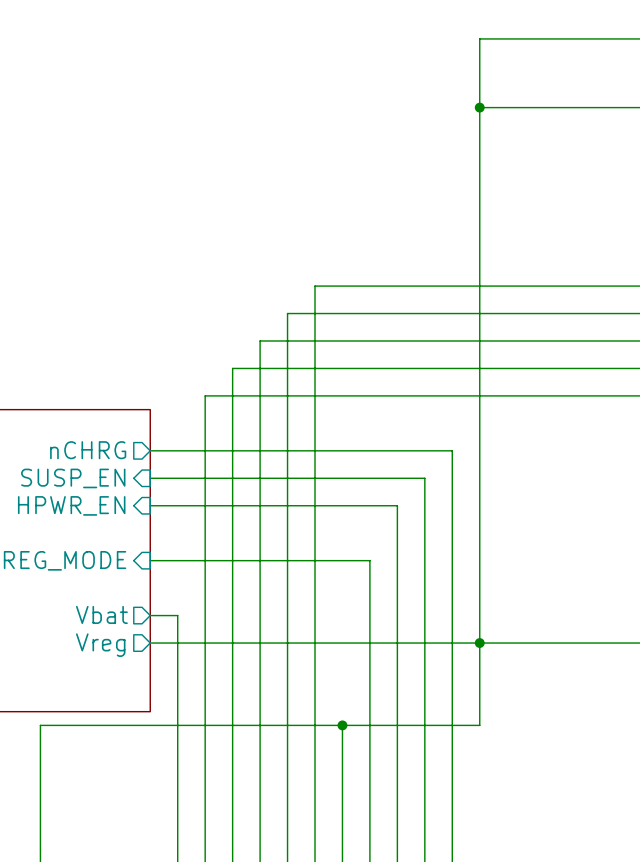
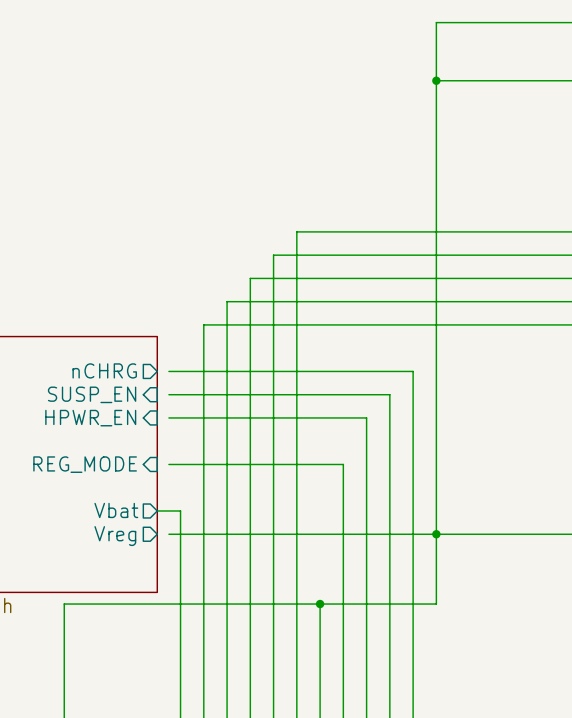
wire: (150, 450) (163, 450) -> none
wire: (150, 478) (163, 478) -> none
wire: (150, 505) (163, 505) -> none
wire: (150, 560) (163, 560) -> none
wire: (150, 643) (163, 643) -> none

